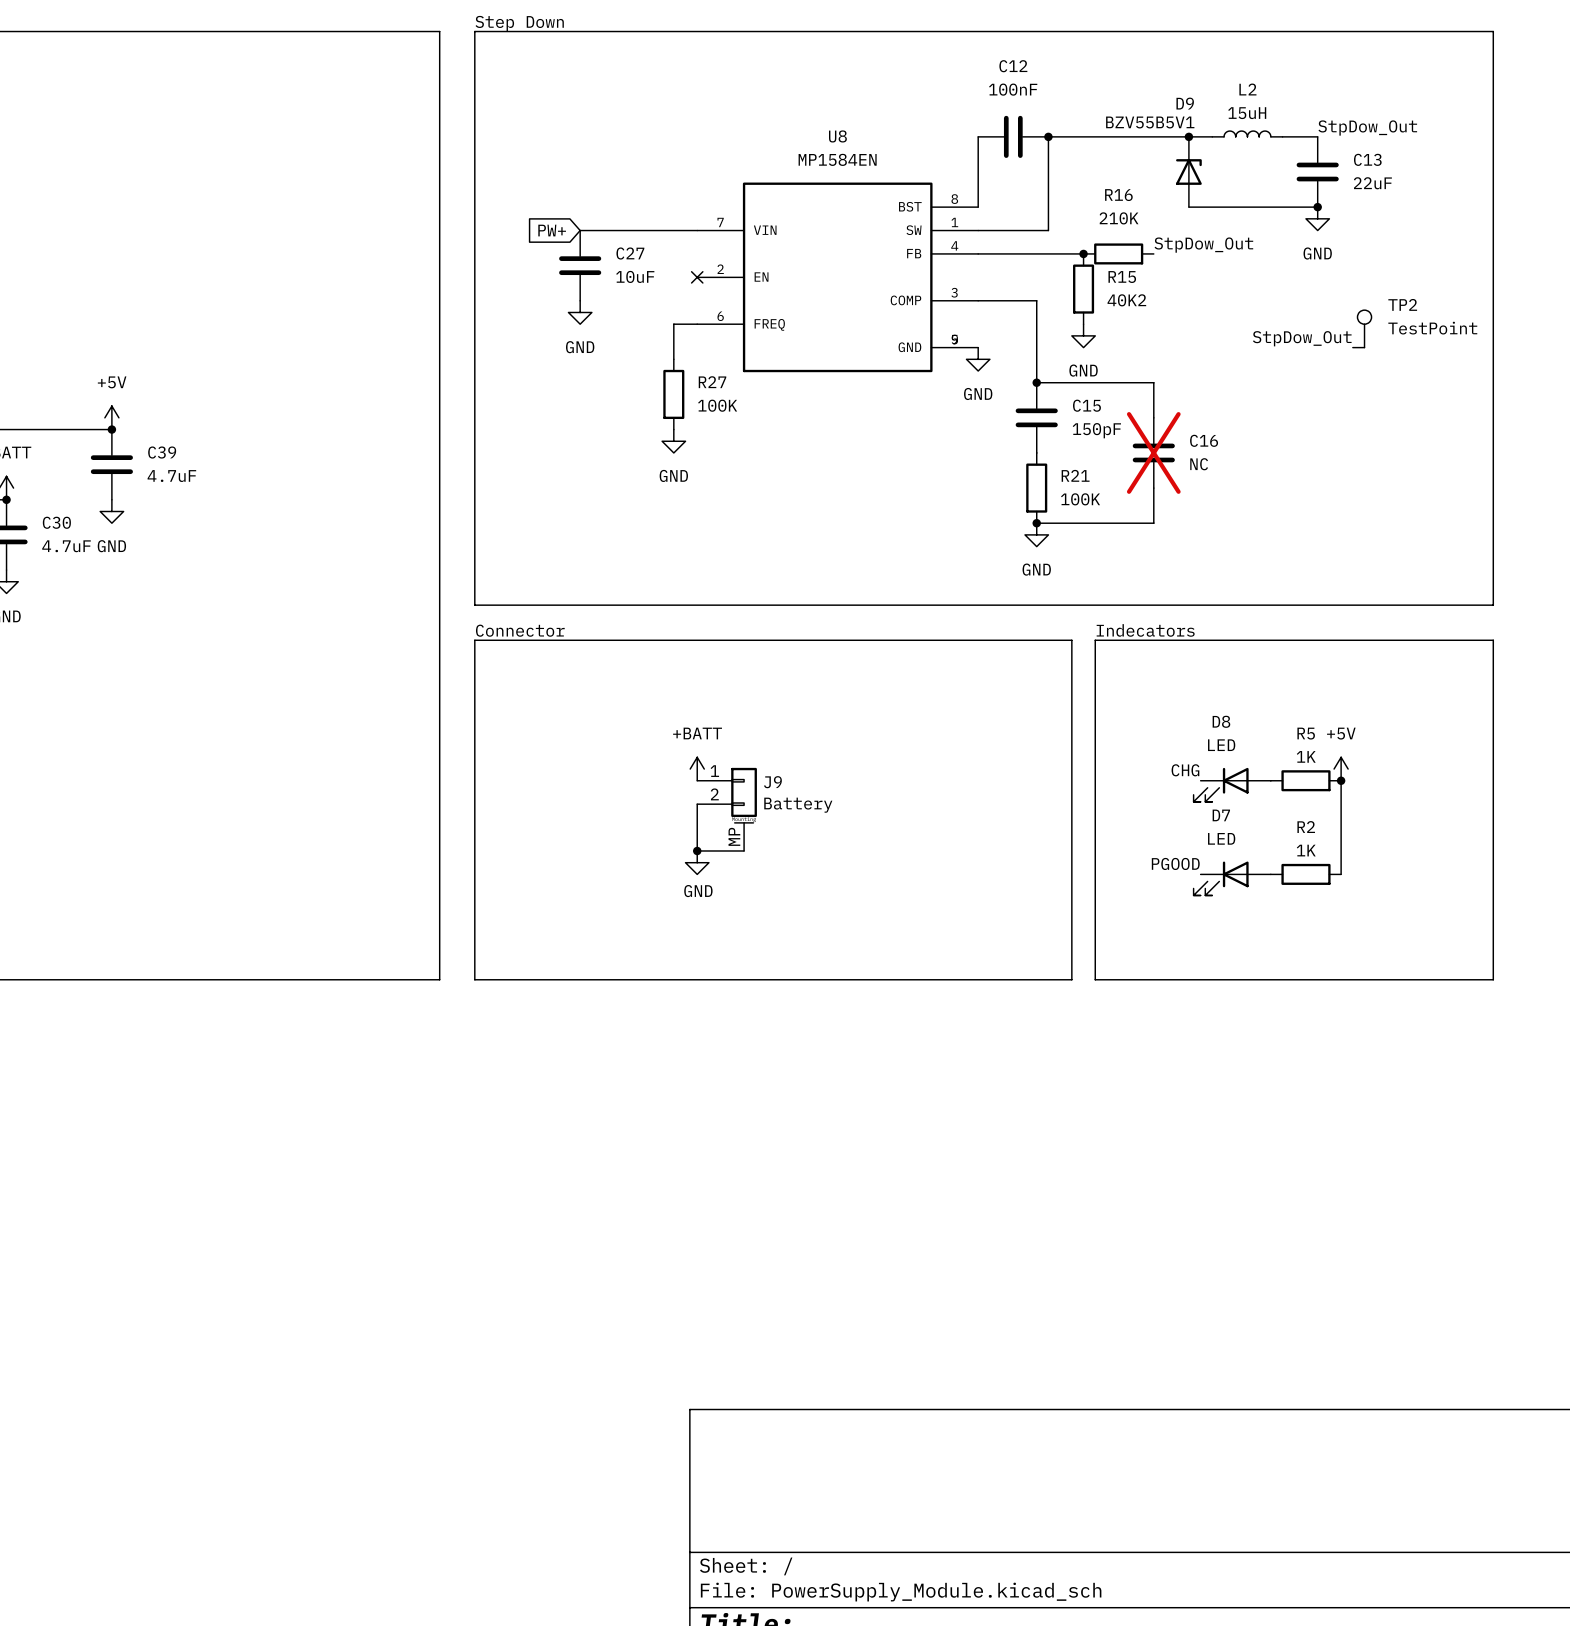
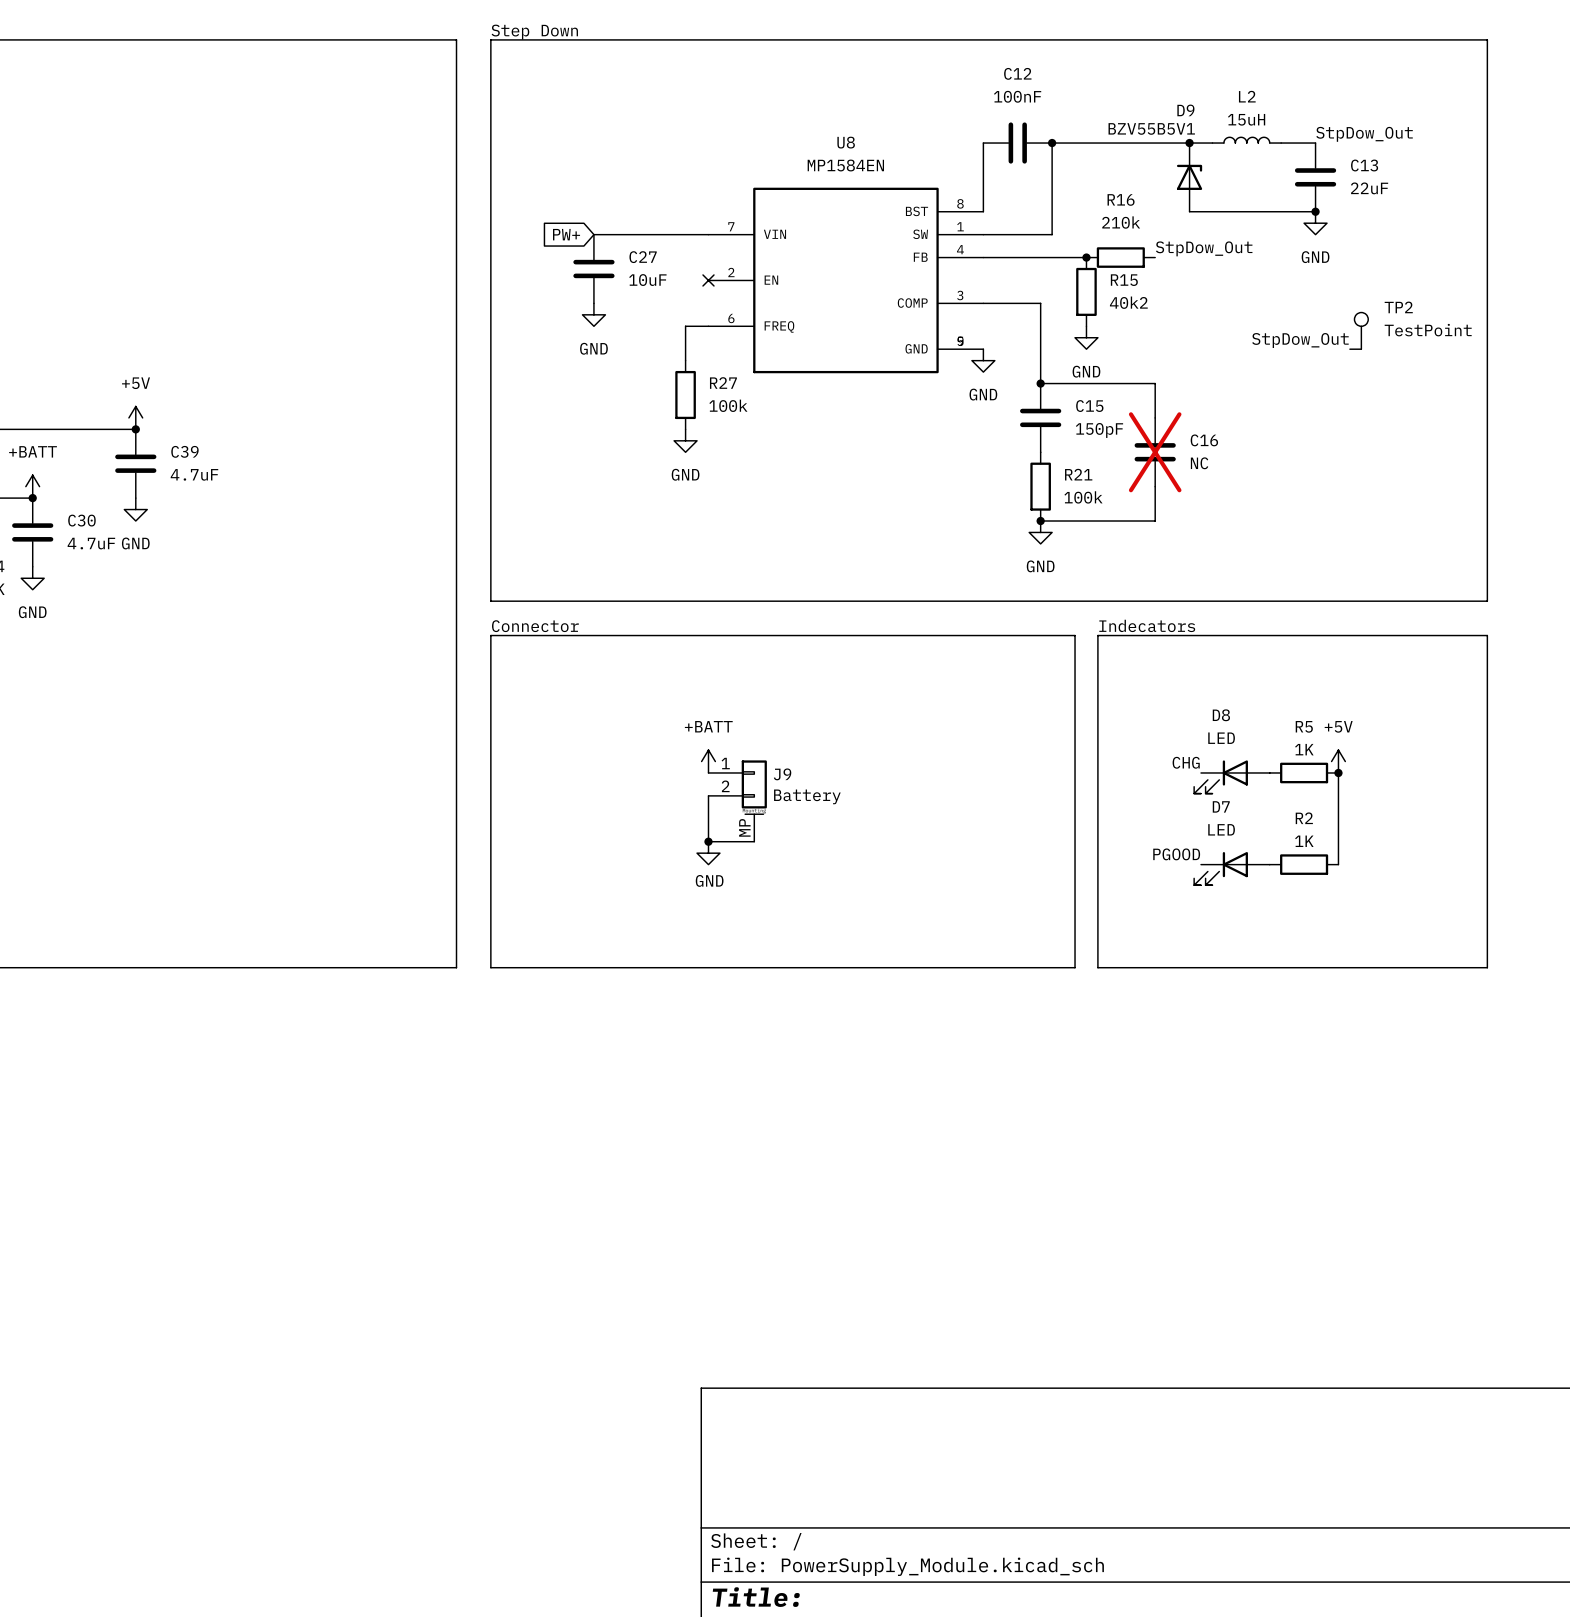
R16 value: 210K (1119, 218) -> 210k (1121, 222)
R15 value: 40K2 (1126, 300) -> 40k2 (1128, 302)
R27 value: 100K (717, 405) -> 100k (728, 405)
R21 value: 100K (1080, 499) -> 100k (1083, 497)

